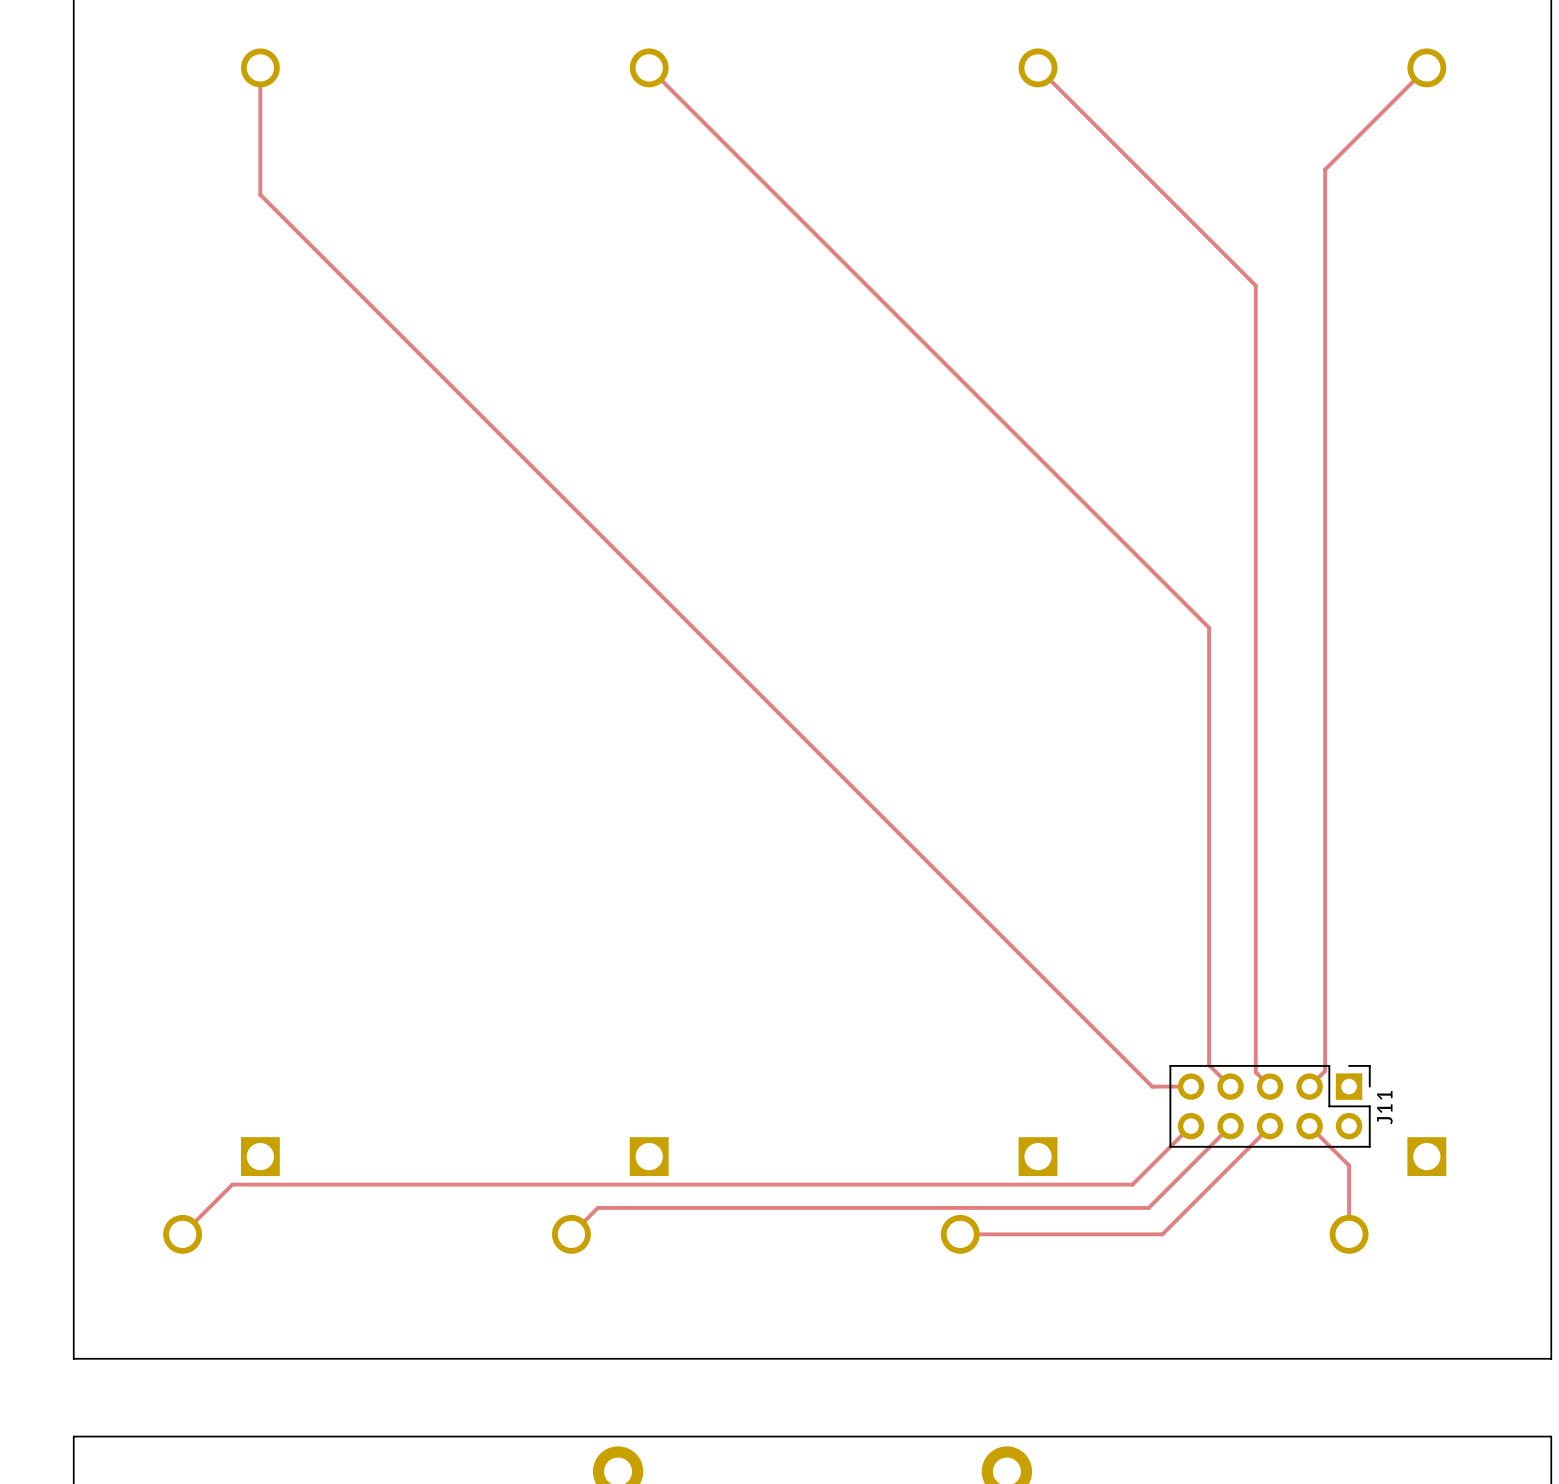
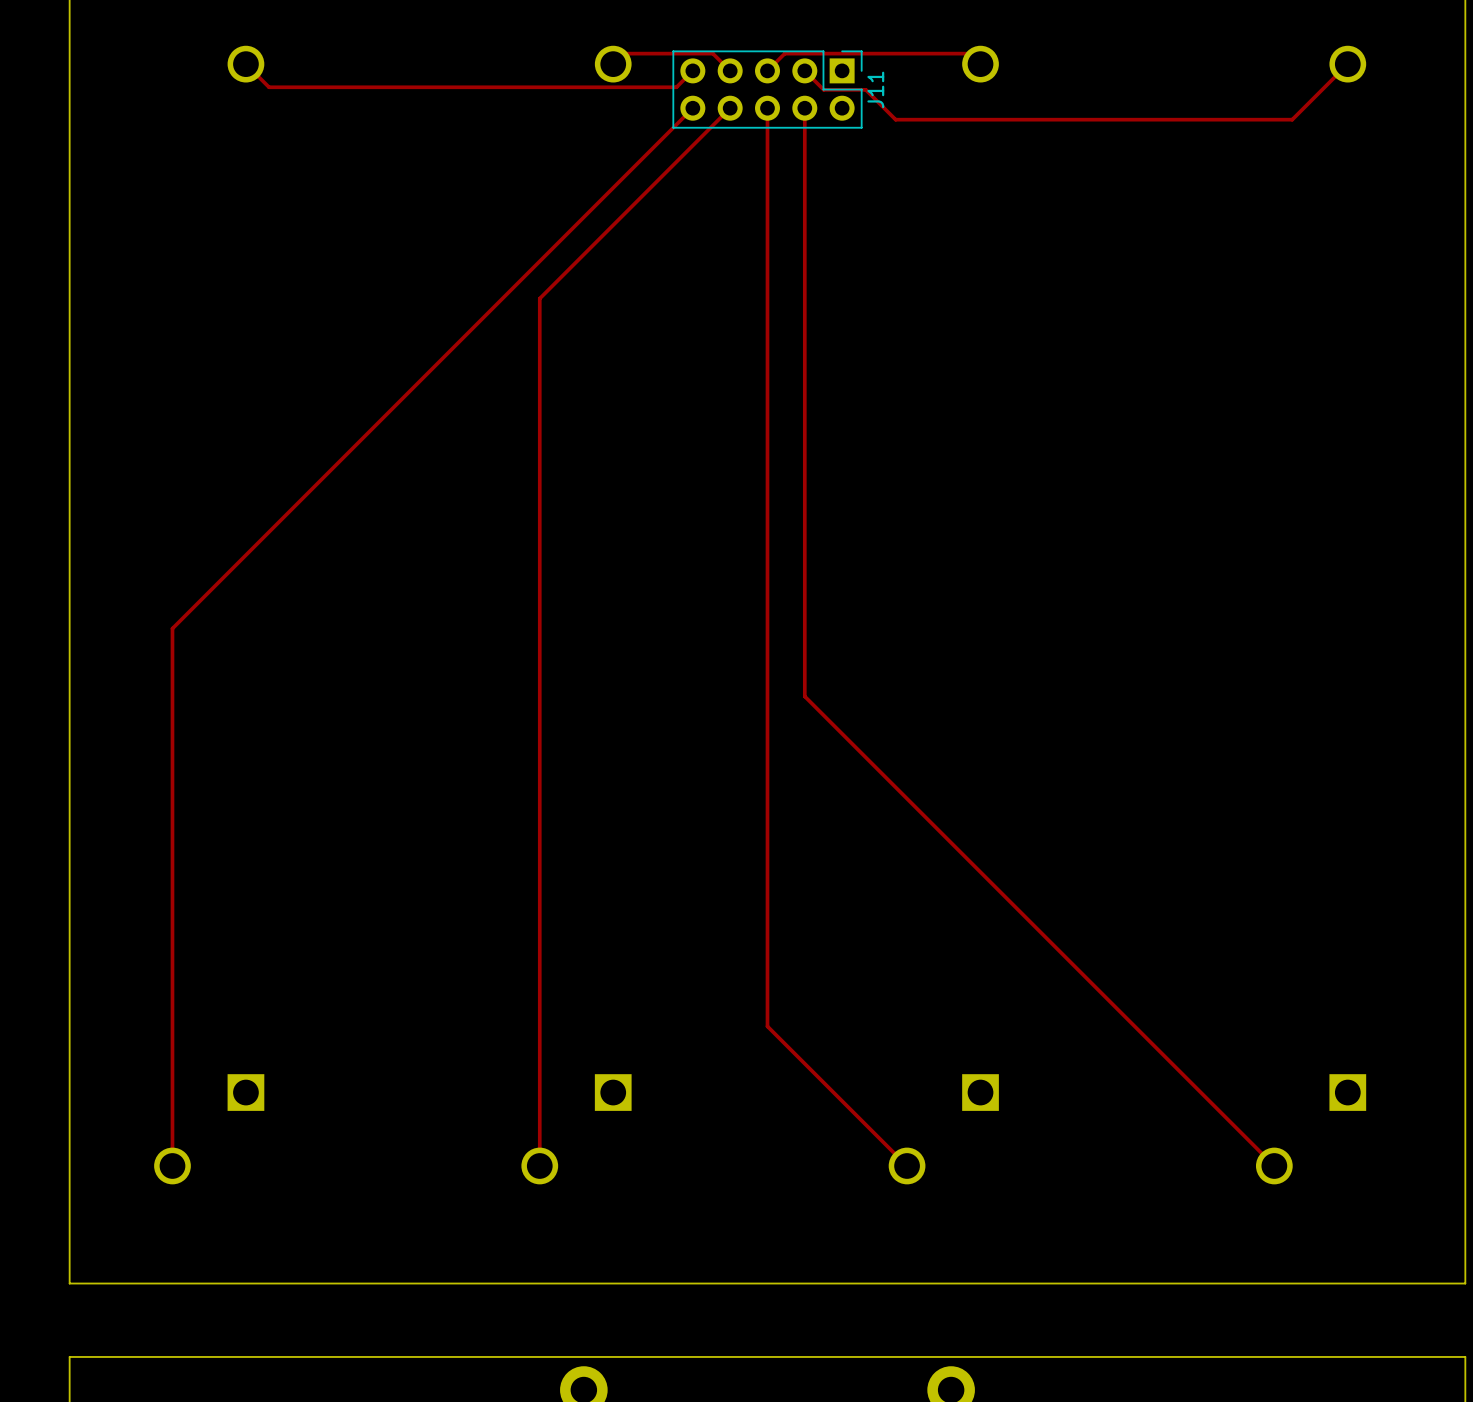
top track: (260, 67) (260, 194) (1152, 1086) (1191, 1086) -> (245, 64) (269, 87) (676, 87) (692, 70)
top track: (649, 67) (1209, 627) (1209, 1065) (1230, 1086) -> (613, 64) (623, 53) (712, 53) (730, 70)
top track: (1038, 67) (1255, 285) (1255, 1072) (1270, 1086) -> (980, 64) (970, 53) (784, 53) (767, 70)
top track: (1368, 126) (1325, 169) (1325, 1071) (1309, 1086) -> (1292, 119) (895, 119) (865, 89) (823, 89) (804, 70)
J11 position: (1270, 1106) -> (767, 89)
top track: (1191, 1126) (1132, 1184) (232, 1184) (182, 1234) -> (692, 108) (172, 628) (172, 1165)
top track: (1230, 1126) (1148, 1207) (597, 1207) (571, 1234) -> (730, 108) (539, 298) (539, 1165)
top track: (1270, 1126) (1162, 1234) (960, 1234) -> (767, 108) (767, 1026) (907, 1165)
top track: (1309, 1126) (1349, 1165) (1349, 1234) -> (804, 108) (804, 696) (1274, 1165)

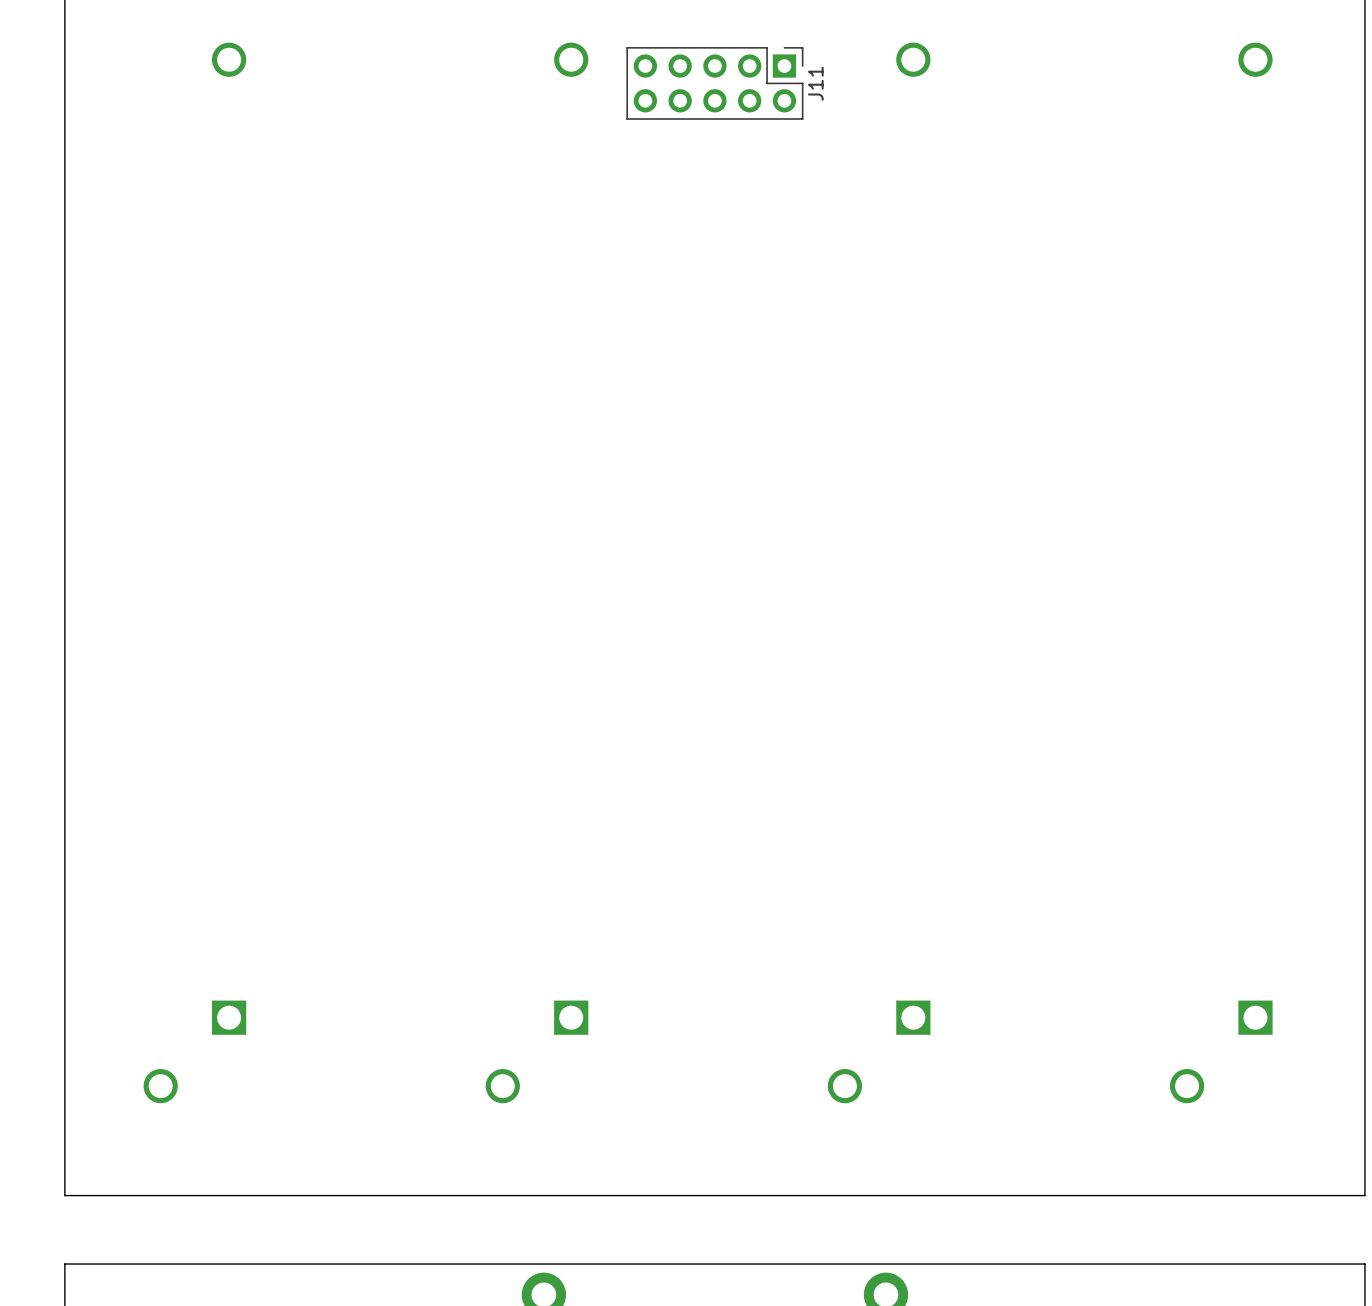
top track: (245, 64) (269, 87) (676, 87) (692, 70) -> none
top track: (613, 64) (623, 53) (712, 53) (730, 70) -> none
top track: (980, 64) (970, 53) (784, 53) (767, 70) -> none
top track: (1347, 64) (1292, 119) (895, 119) (865, 89) (823, 89) (804, 70) -> none
top track: (692, 108) (172, 628) (172, 1165) -> none
top track: (730, 108) (539, 298) (539, 1165) -> none
top track: (767, 108) (767, 1026) (907, 1165) -> none
top track: (804, 108) (804, 696) (1274, 1165) -> none

